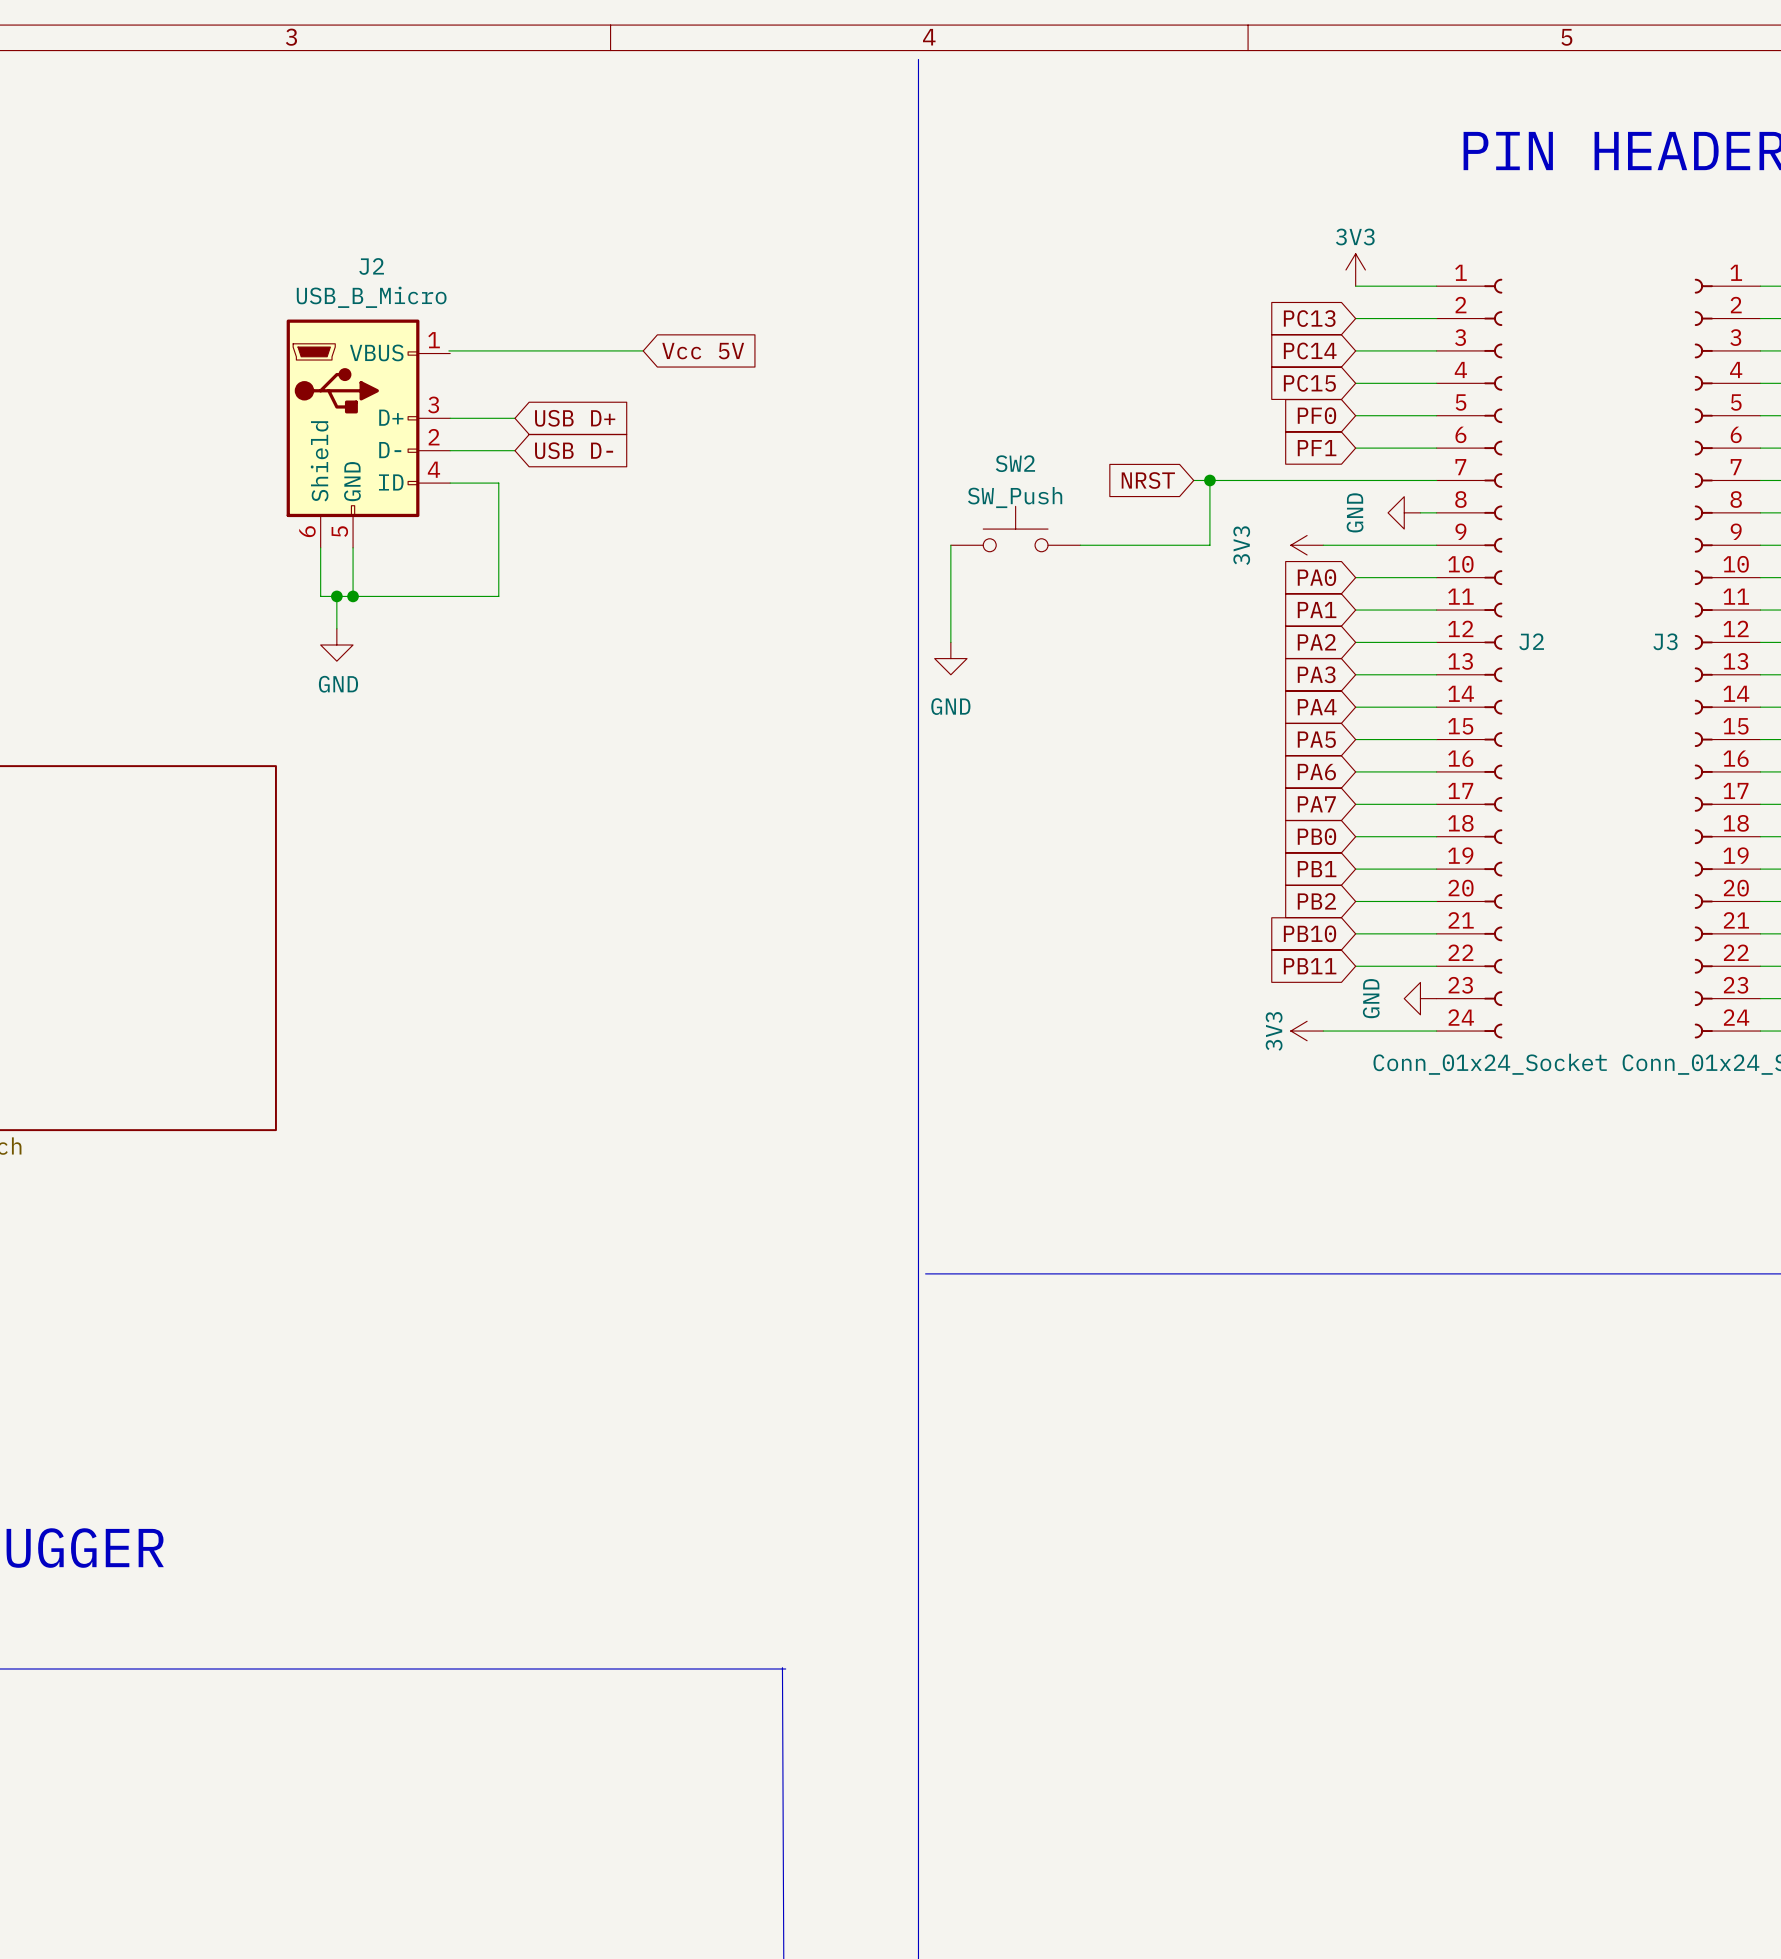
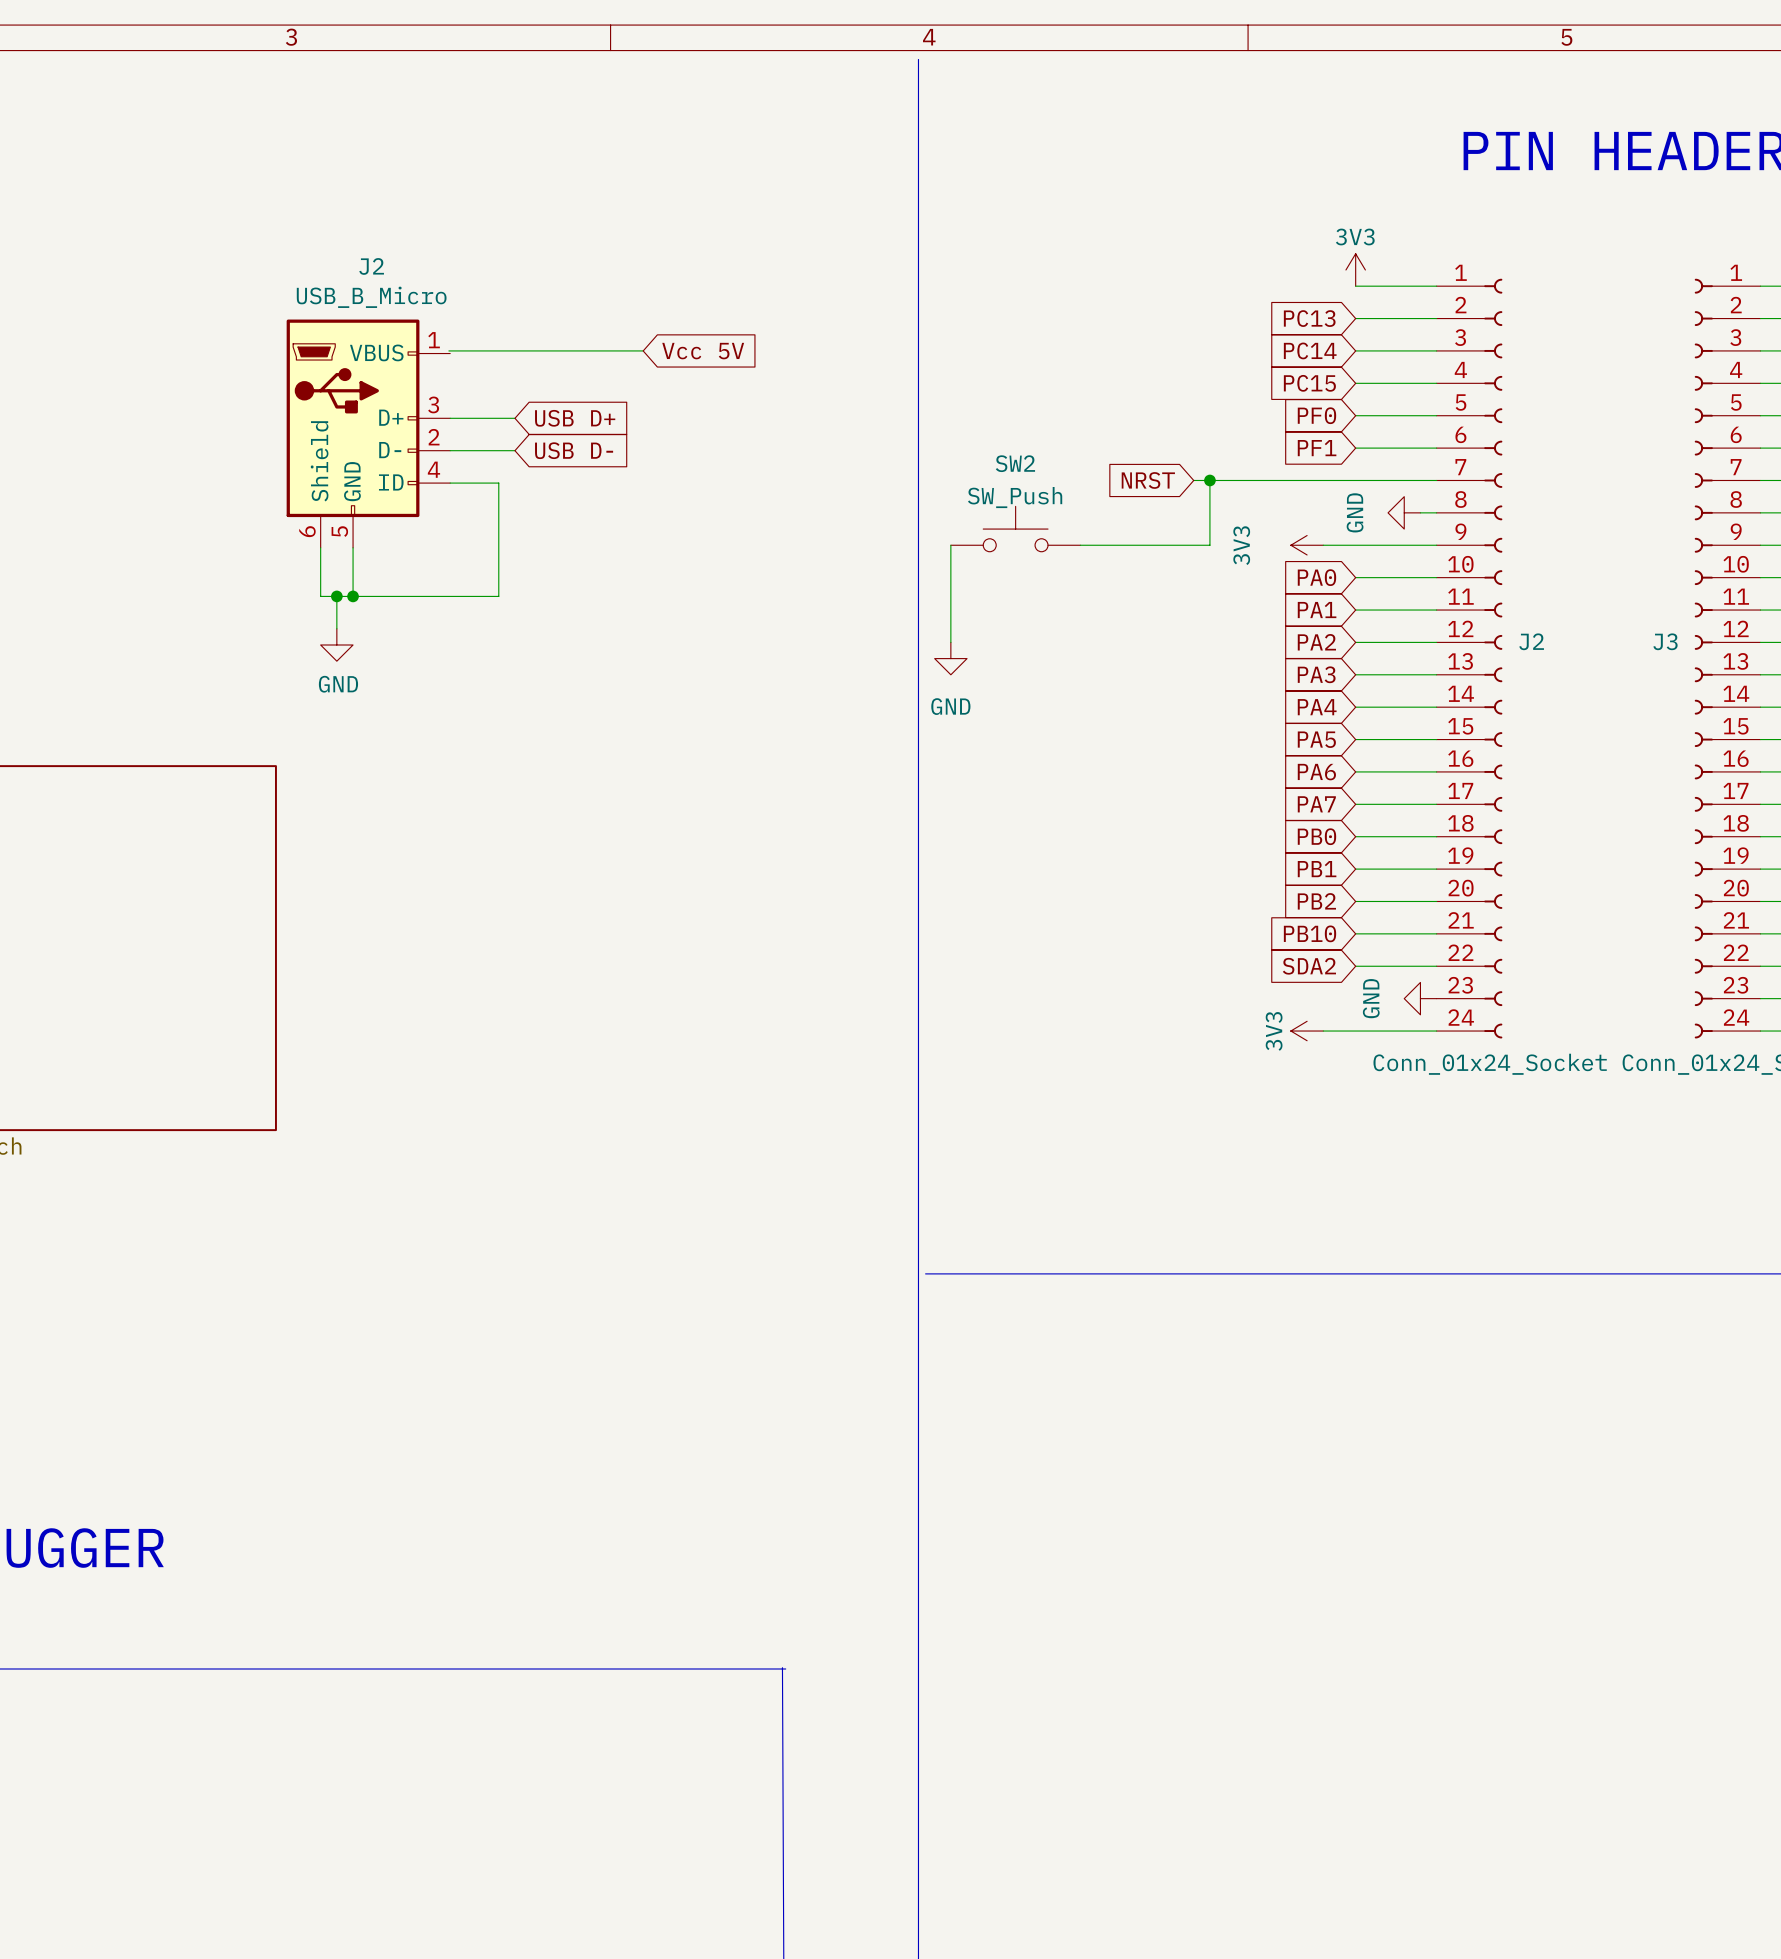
global label: PB11 (1310, 966) -> SDA2 (1309, 966)

